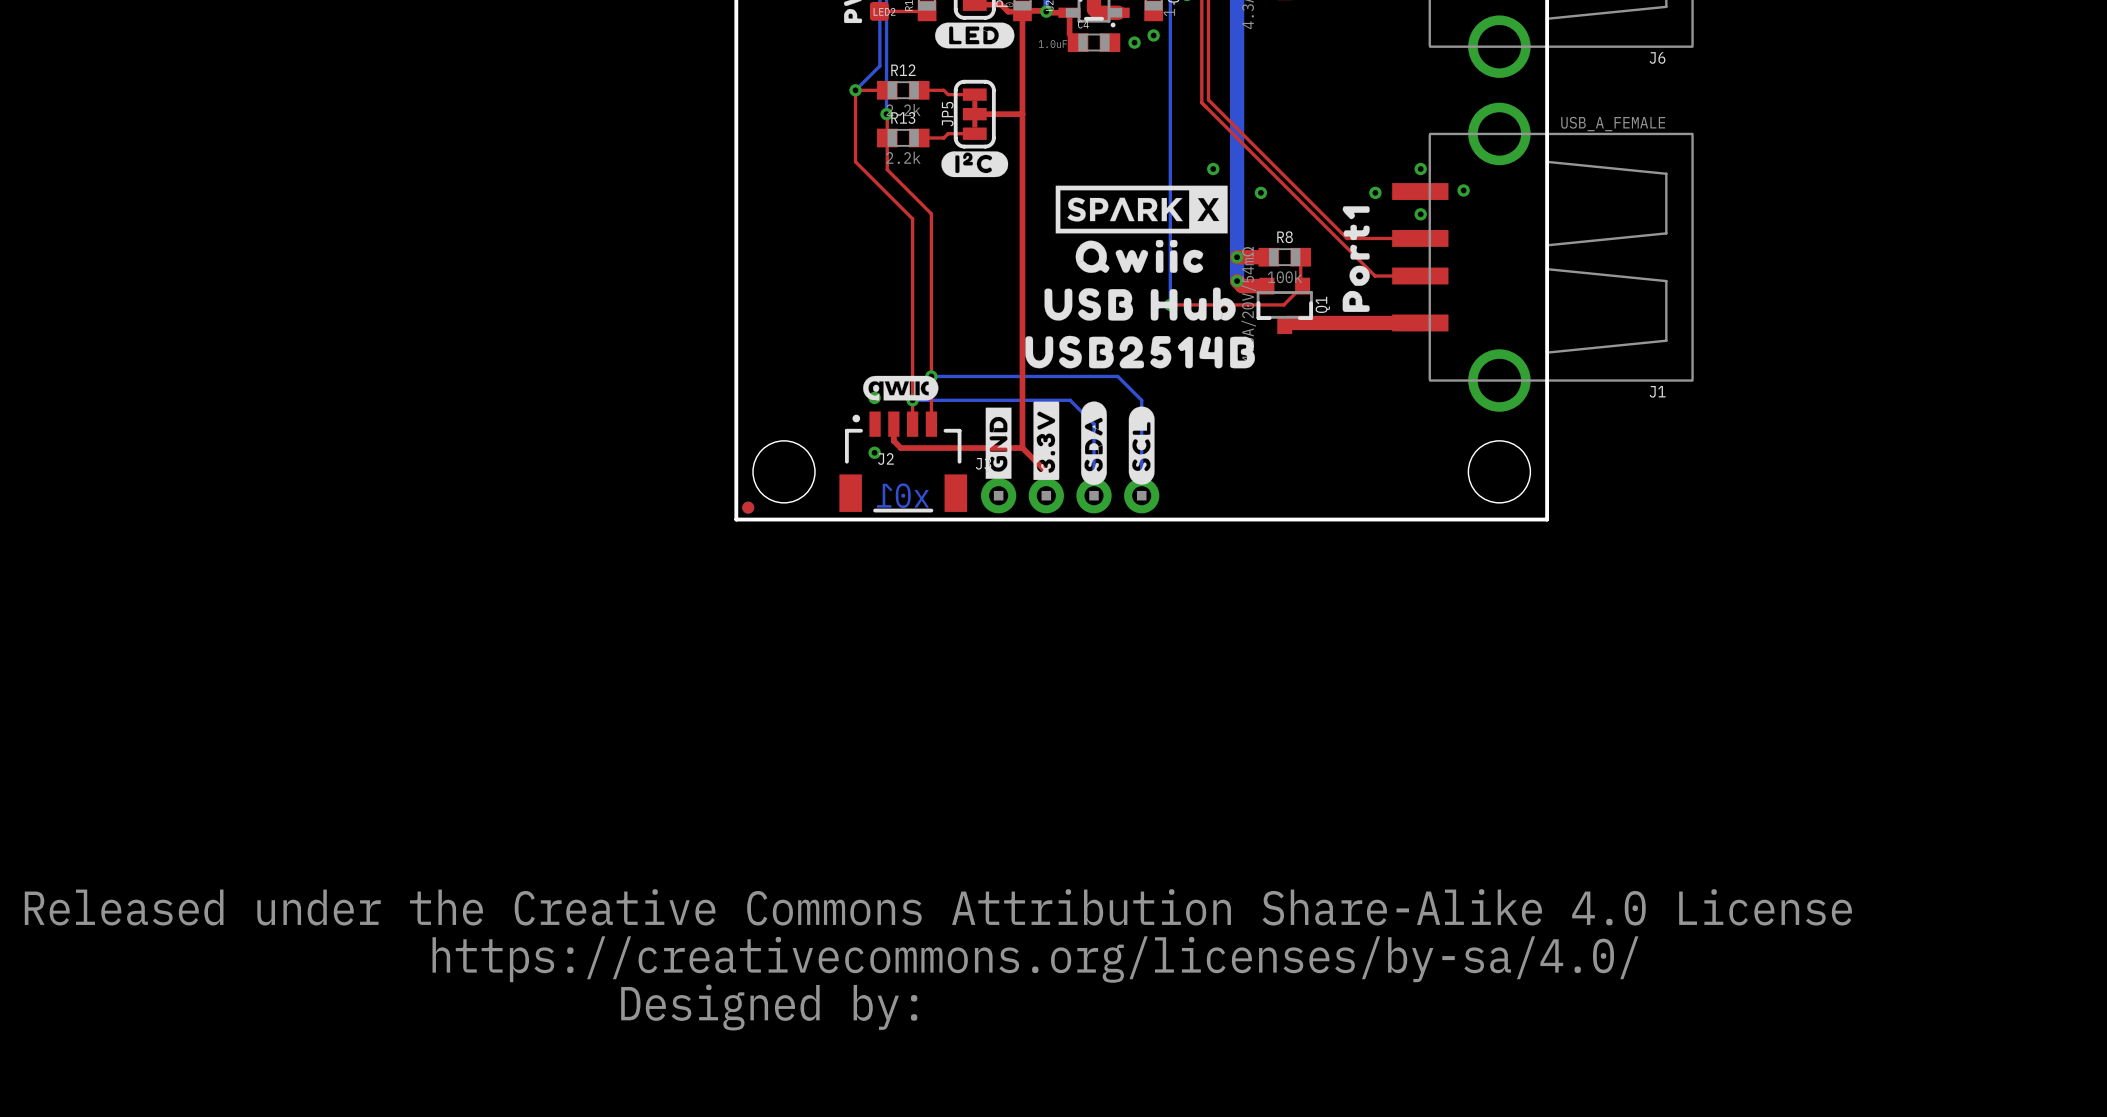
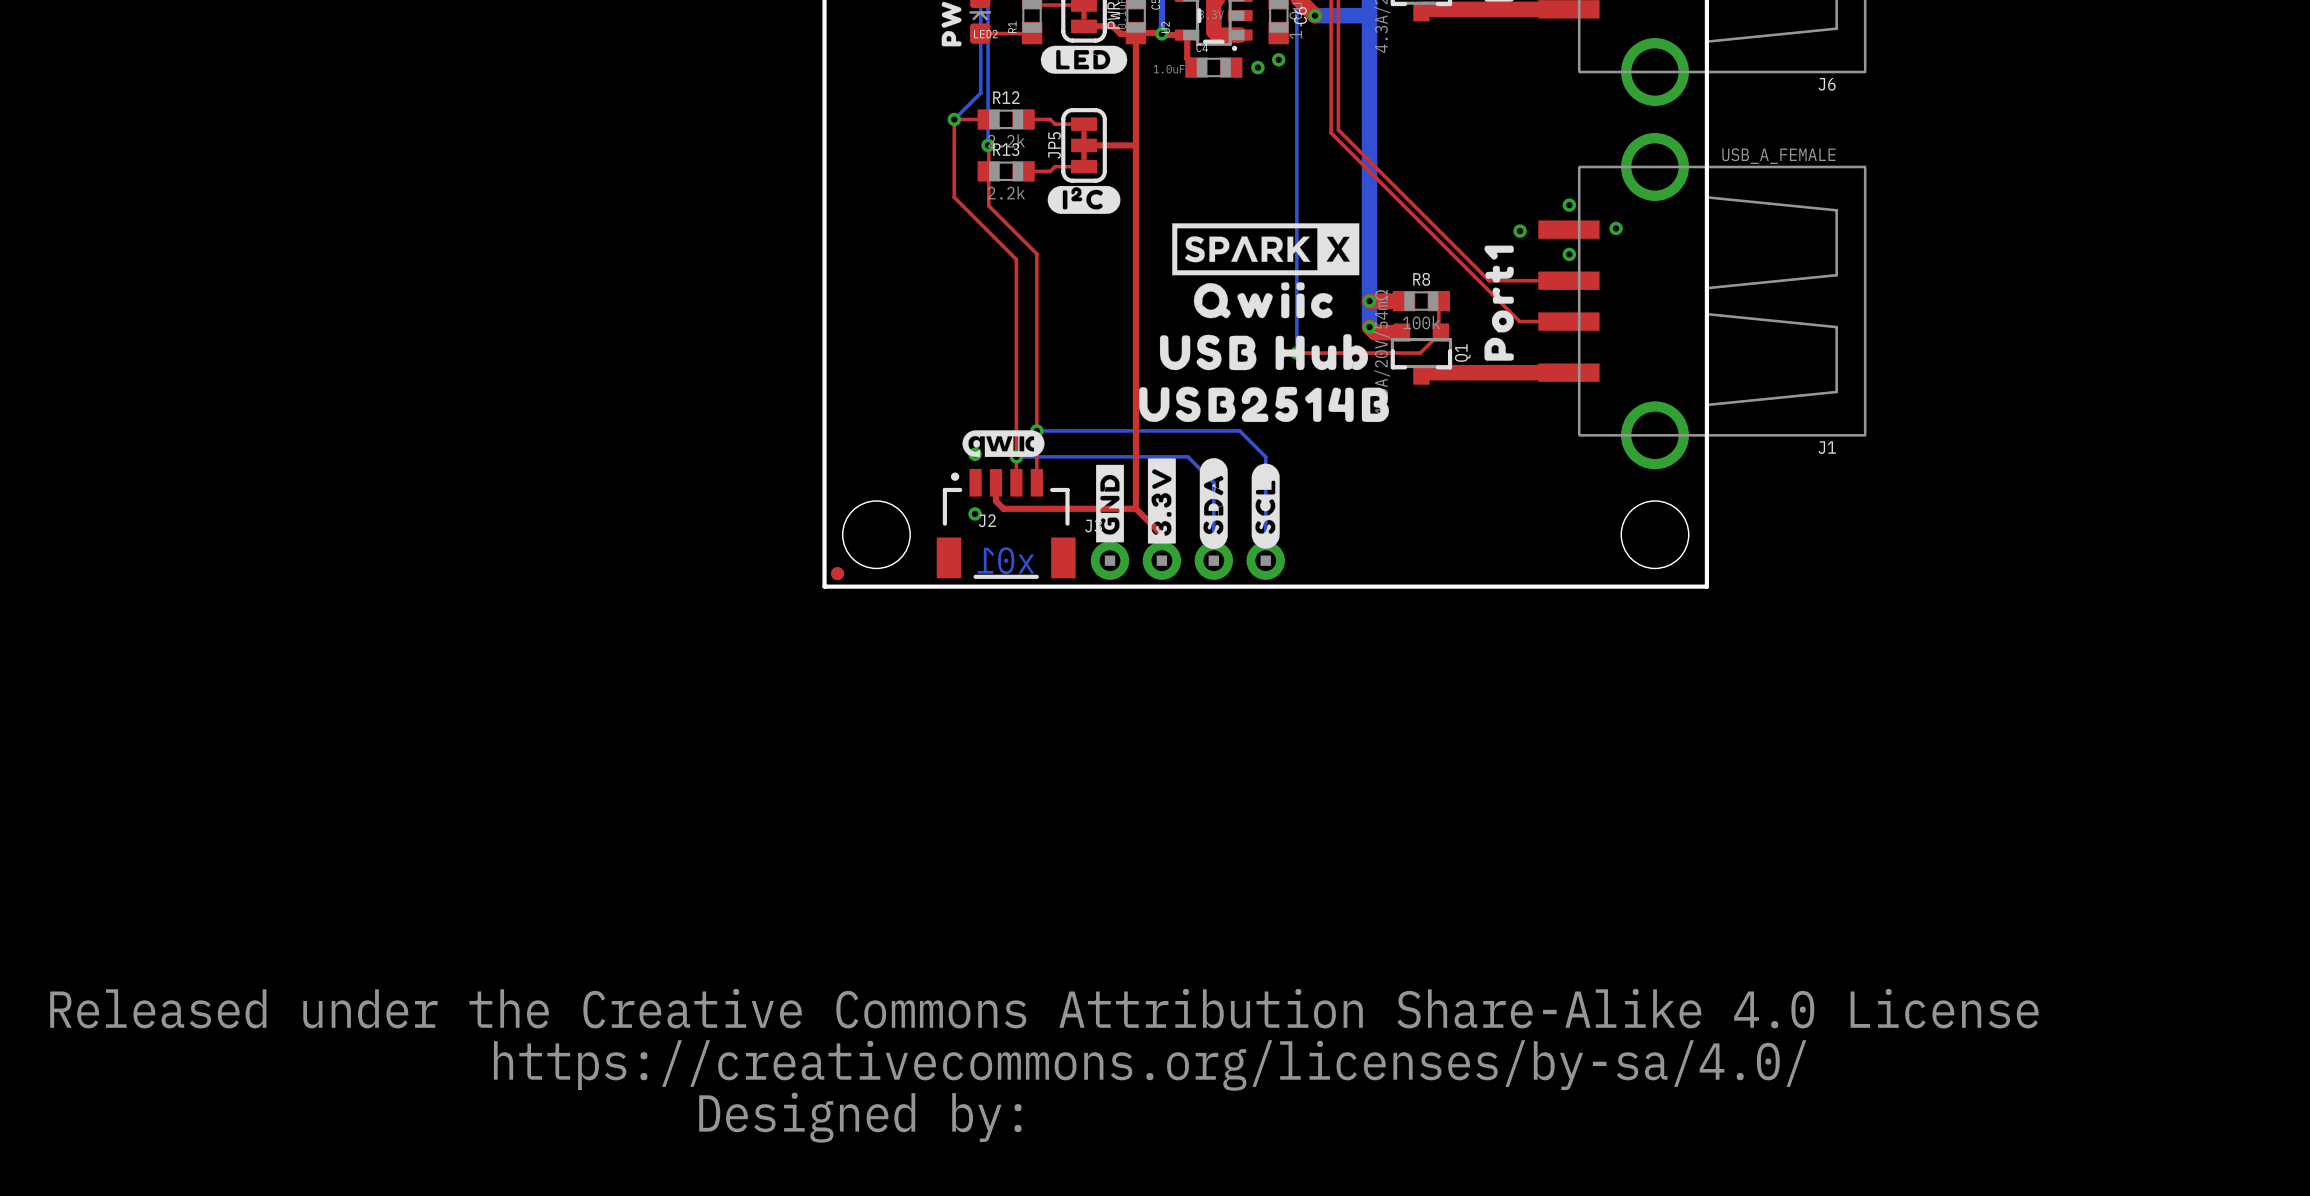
via: (1213, 169) -> none
via: (1260, 192) -> none

